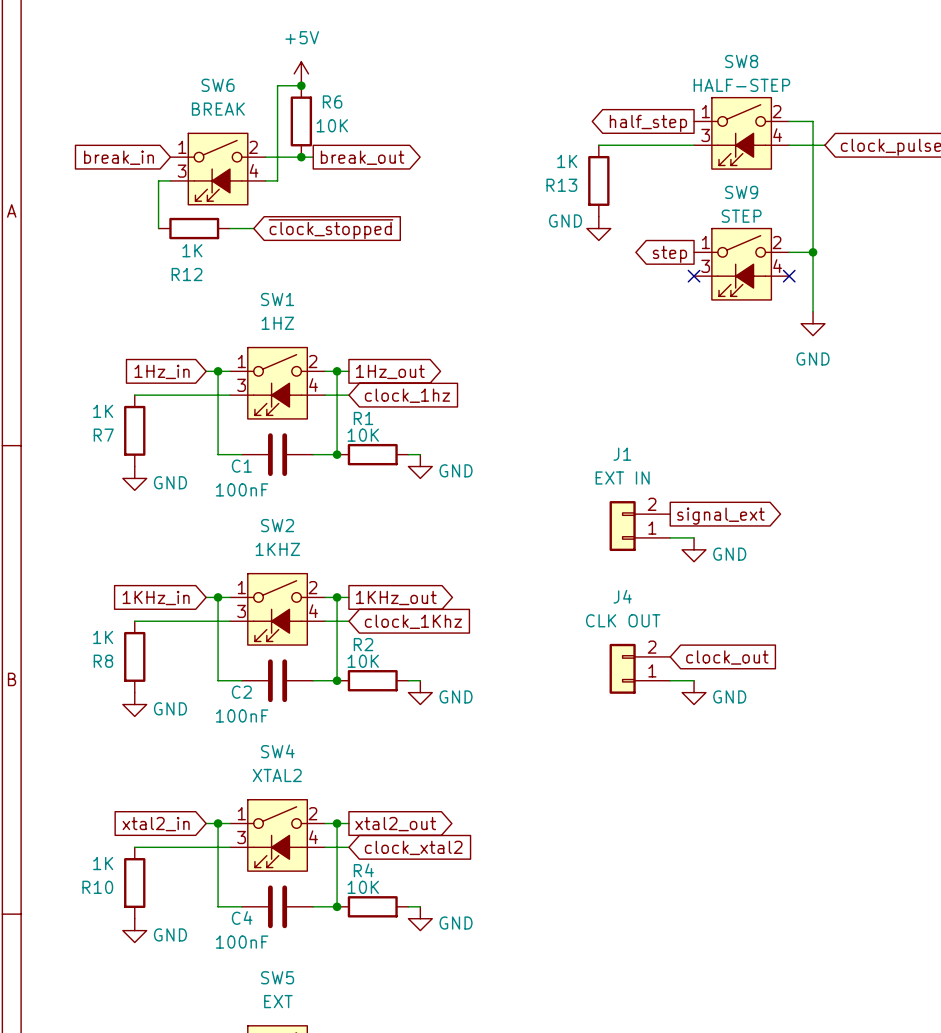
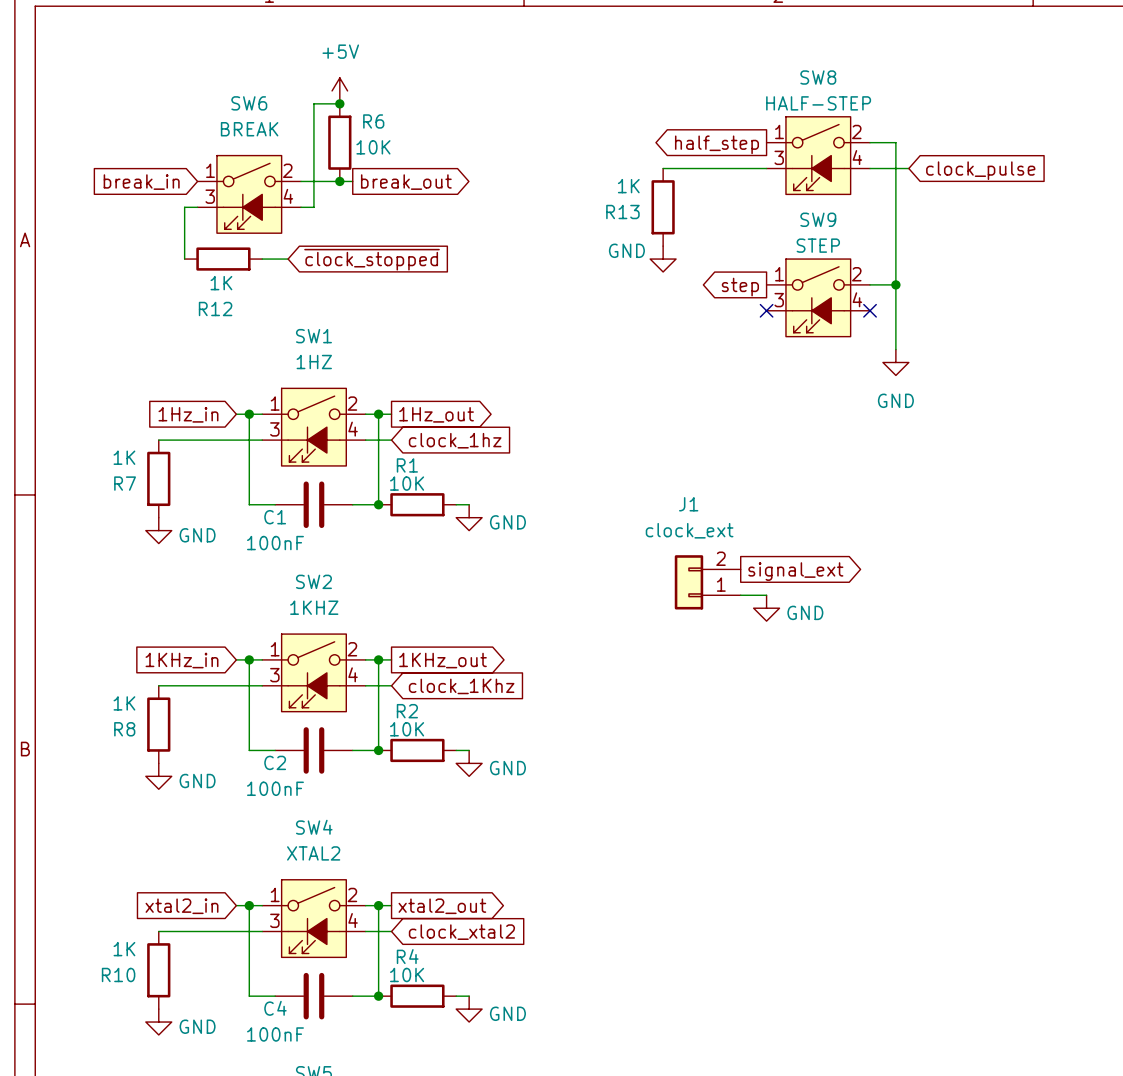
J1 value: EXT IN (622, 477) -> clock_ext (689, 530)
global label: clock_out (727, 657) -> none
J4: CLK OUT (639, 668) -> none
wire: (670, 680) (694, 680) -> none
power symbol: GND (694, 692) -> none

